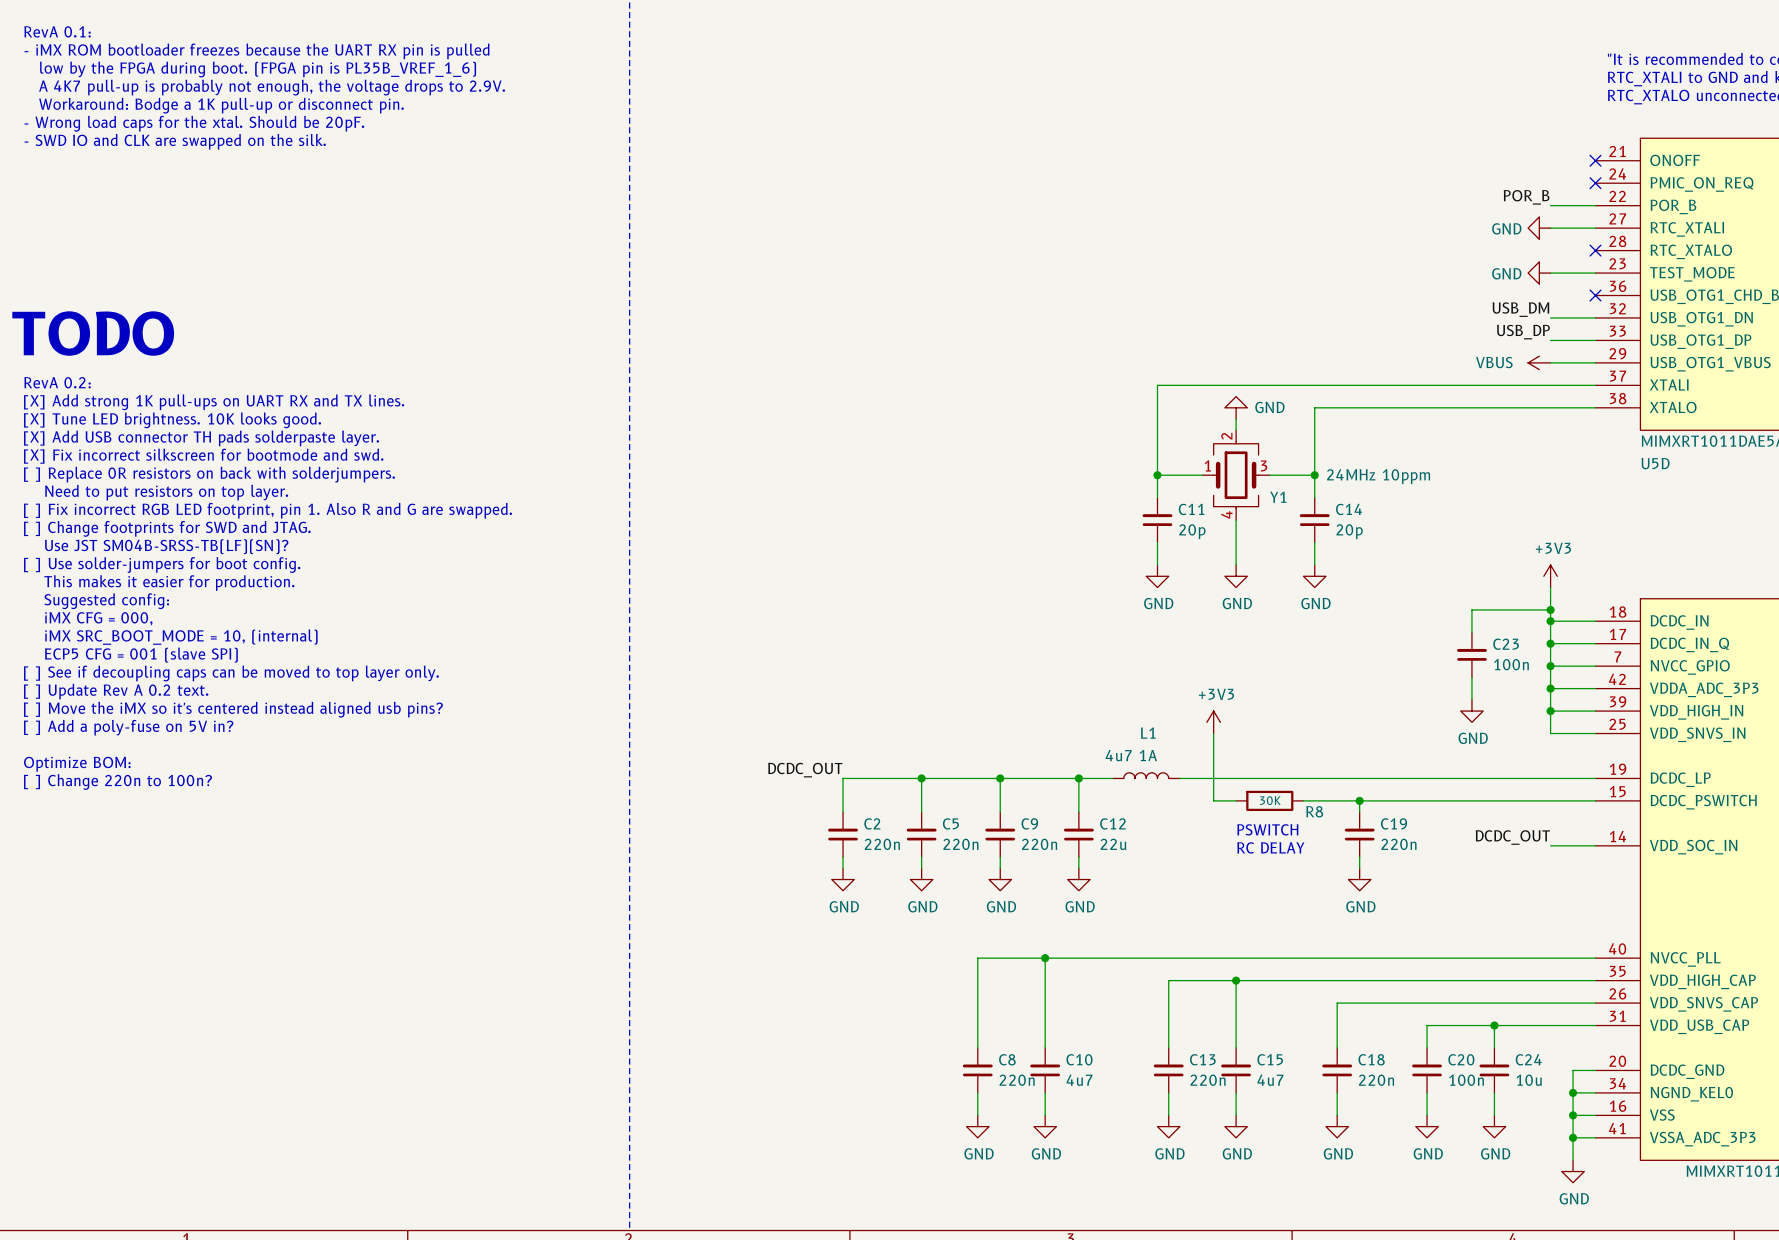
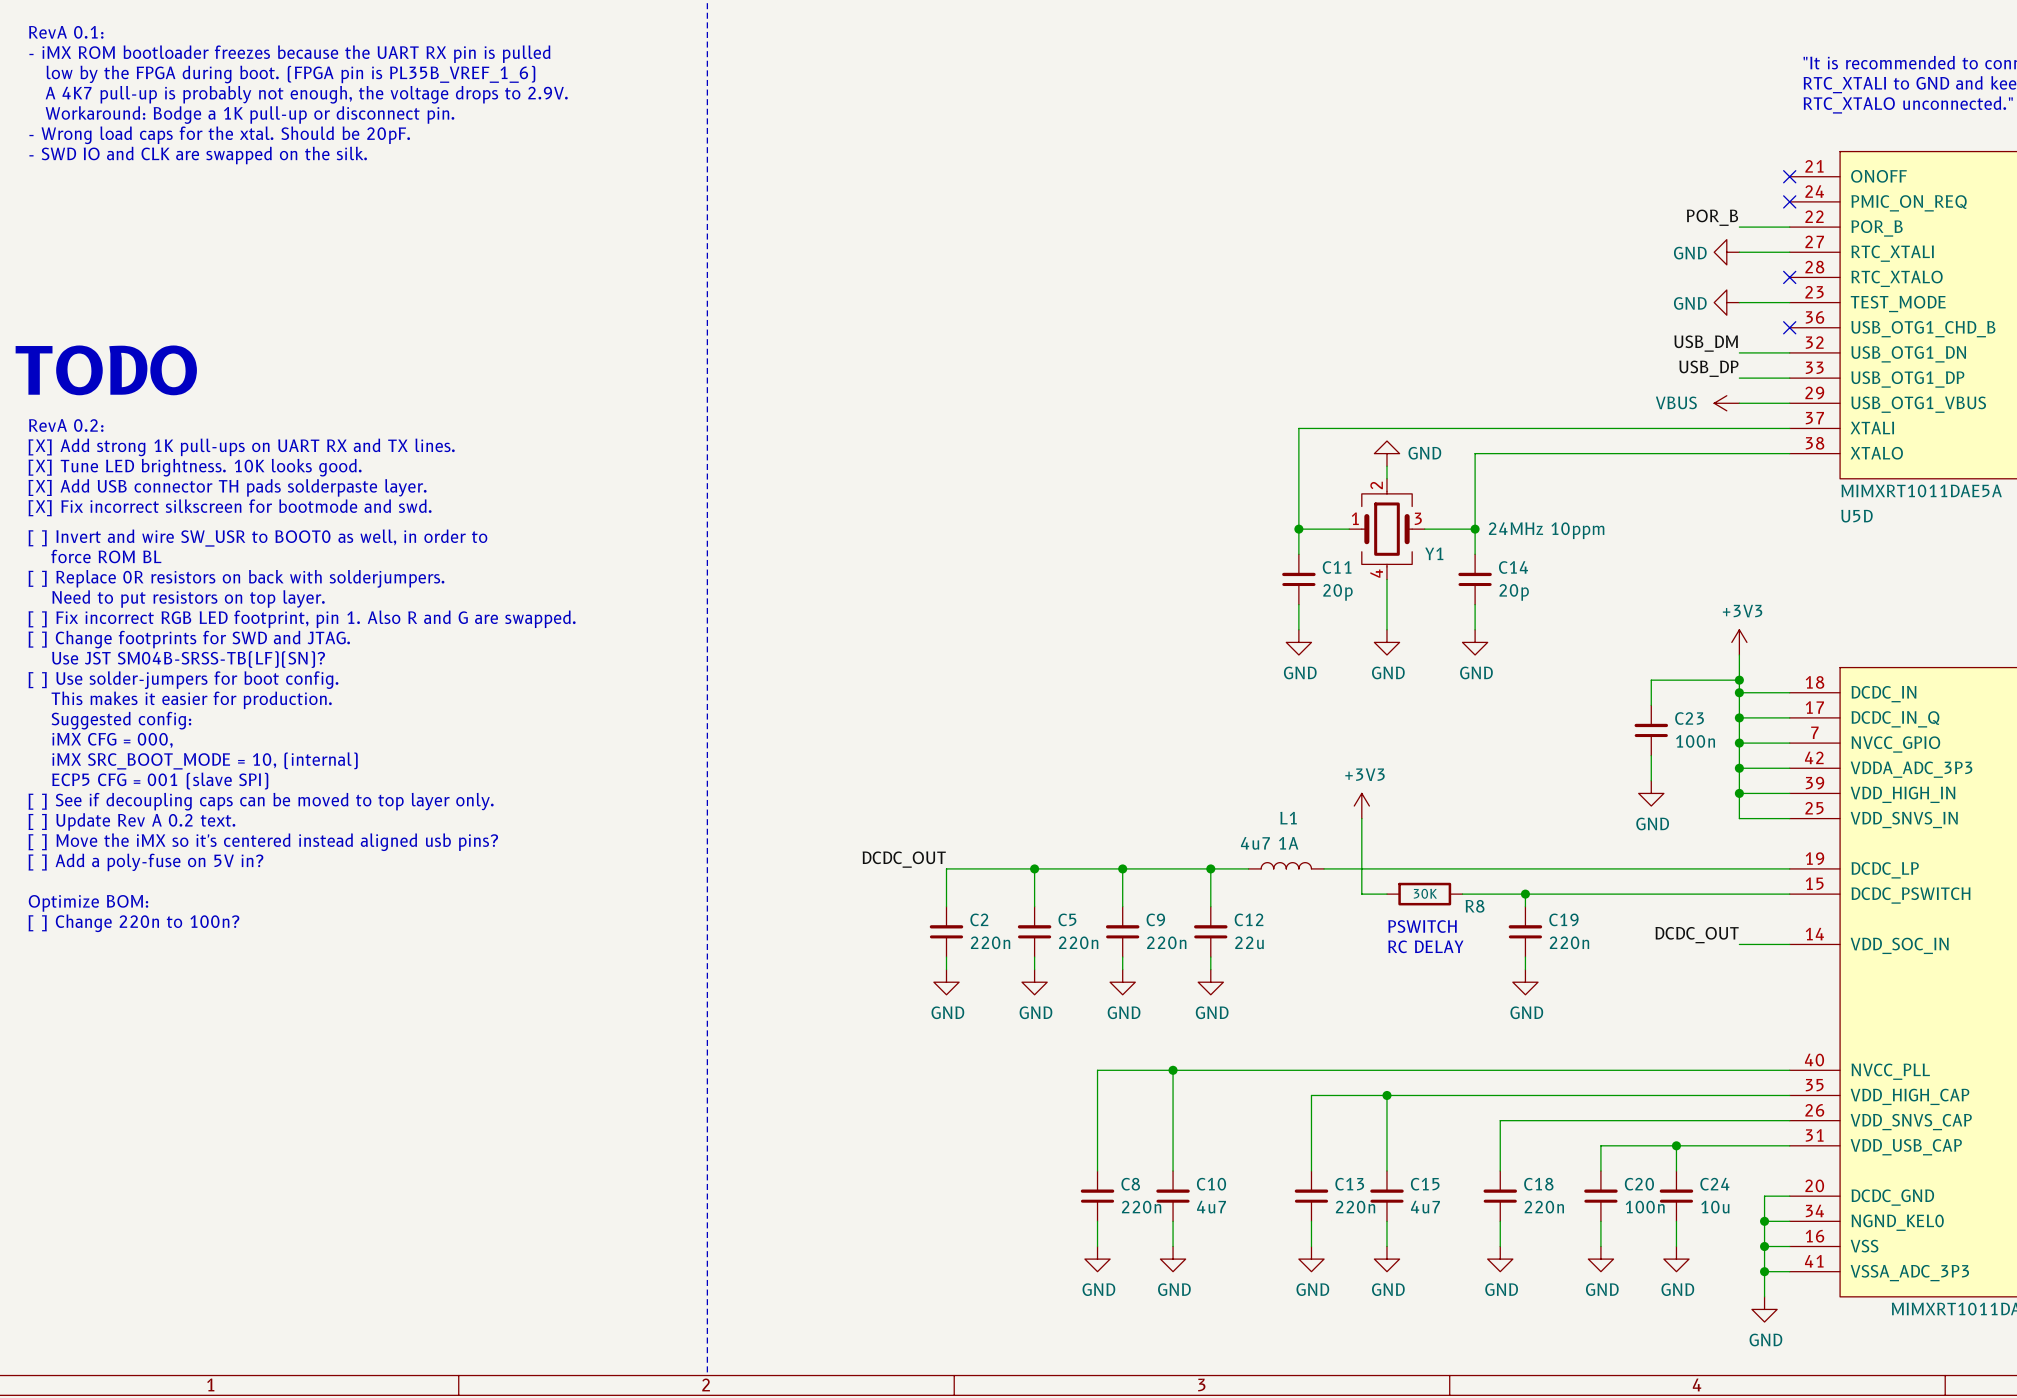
text position: [ ] Replace 0R resistors on back with solderjumpers. (209, 474) -> [ ] Replace 0R resistors on back with solderjumpers. (236, 578)
text: none -> [ ] Invert and wire SW_USR to BOOT0 as well, in order to (257, 538)
text position: Need to put resistors on top layer. (166, 492) -> Need to put resistors on top layer. (188, 599)
text: none -> force ROM BL (106, 556)
text position: [ ] Fix incorrect RGB LED footprint, pin 1. Also R and G are swapped. (267, 510) -> [ ] Fix incorrect RGB LED footprint, pin 1. Also R and G are swapped. (302, 619)
text position: [ ] Change footprints for SWD and JTAG. (167, 528) -> [ ] Change footprints for SWD and JTAG. (189, 639)
text position: Use JST SM04B-SRSS-TB(LF)(SN)? (166, 546) -> Use JST SM04B-SRSS-TB(LF)(SN)? (188, 659)
text position: [ ] Use solder-jumpers for boot config. (162, 565) -> [ ] Use solder-jumpers for boot config. (183, 680)
text position: This makes it easier for production. (169, 583) -> This makes it easier for production. (191, 700)
text position: Suggested config: (106, 601) -> Suggested config: (121, 720)
text position: iMX CFG = 000, (98, 618) -> iMX CFG = 000, (112, 740)
text position: iMX SRC_BOOT_MODE = 10, (internal) (181, 637) -> iMX SRC_BOOT_MODE = 10, (internal) (205, 760)
text position: ECP5 CFG = 001 (slave SPI) (141, 655) -> ECP5 CFG = 001 (slave SPI) (160, 781)
text position: [ ] See if decoupling caps can be moved to top layer only. (231, 673) -> [ ] See if decoupling caps can be moved to top layer only. (261, 801)
text position: [ ] Update Rev A 0.2 text. (116, 691) -> [ ] Update Rev A 0.2 text. (131, 821)
text position: [ ] Move the iMX so it's centered instead aligned usb pins? (233, 709) -> [ ] Move the iMX so it's centered instead aligned usb pins? (263, 842)
text position: [ ] Add a poly-fuse on 5V in? (128, 727) -> [ ] Add a poly-fuse on 5V in? (145, 862)
text position: Optimize BOM: (77, 764) -> Optimize BOM: (88, 903)
text position: [ ] Change 220n to 100n? (117, 782) -> [ ] Change 220n to 100n? (133, 923)

